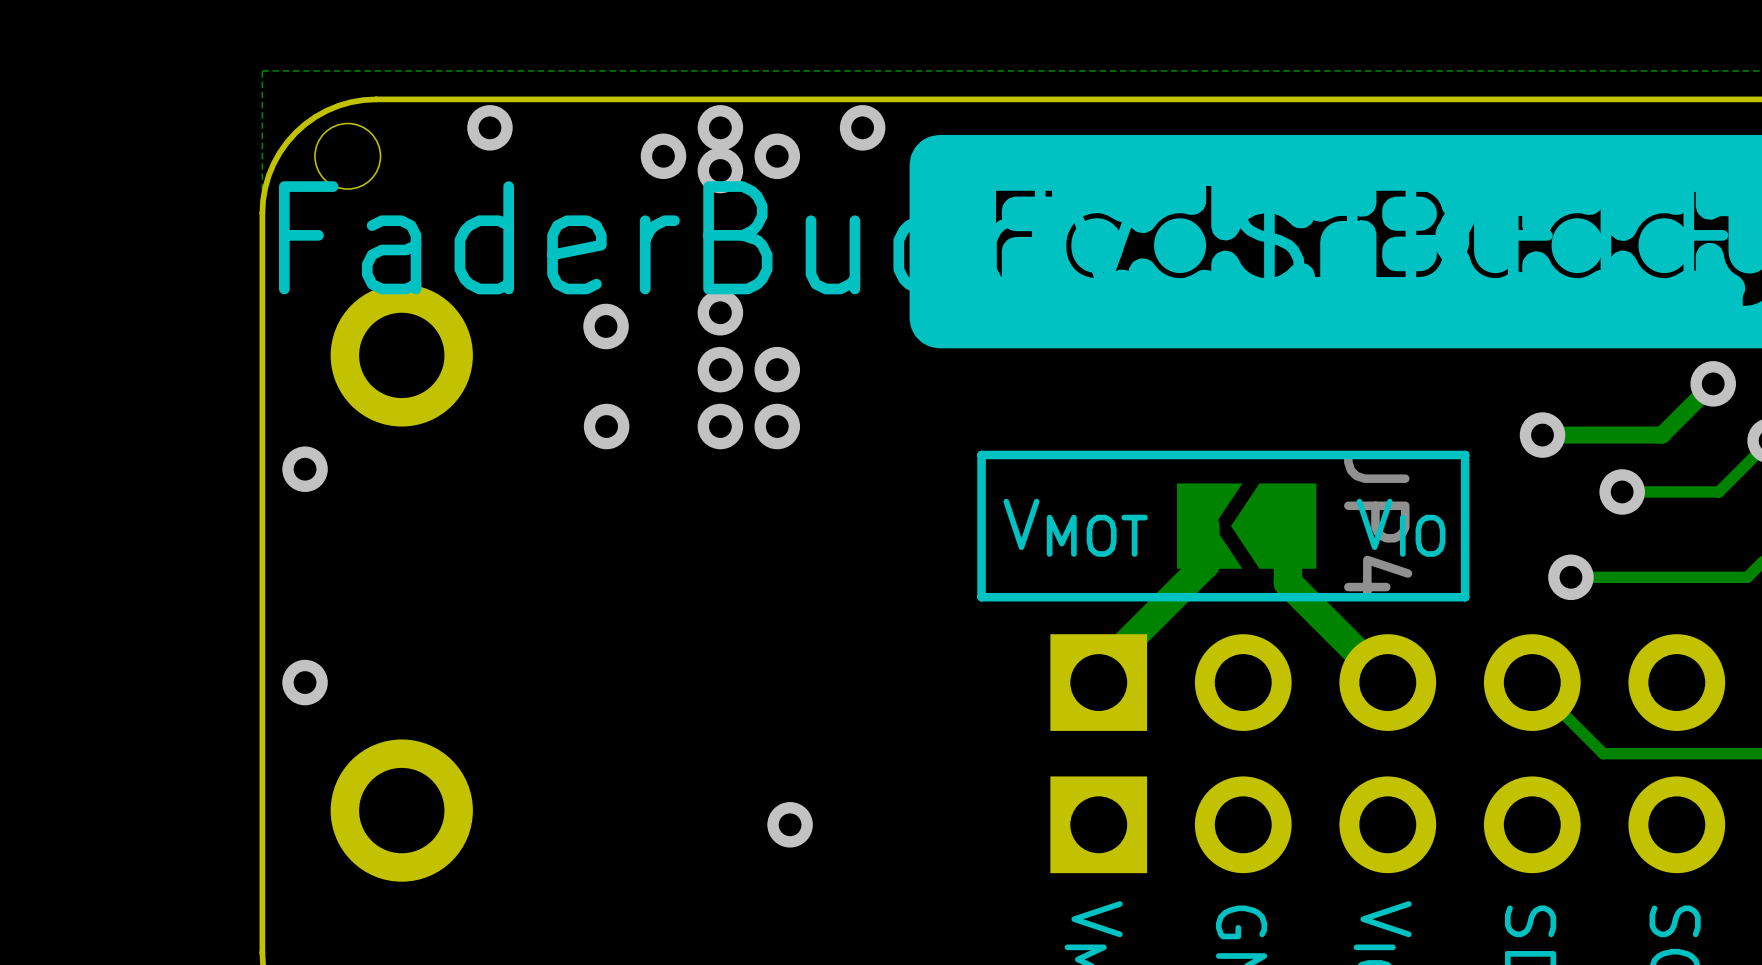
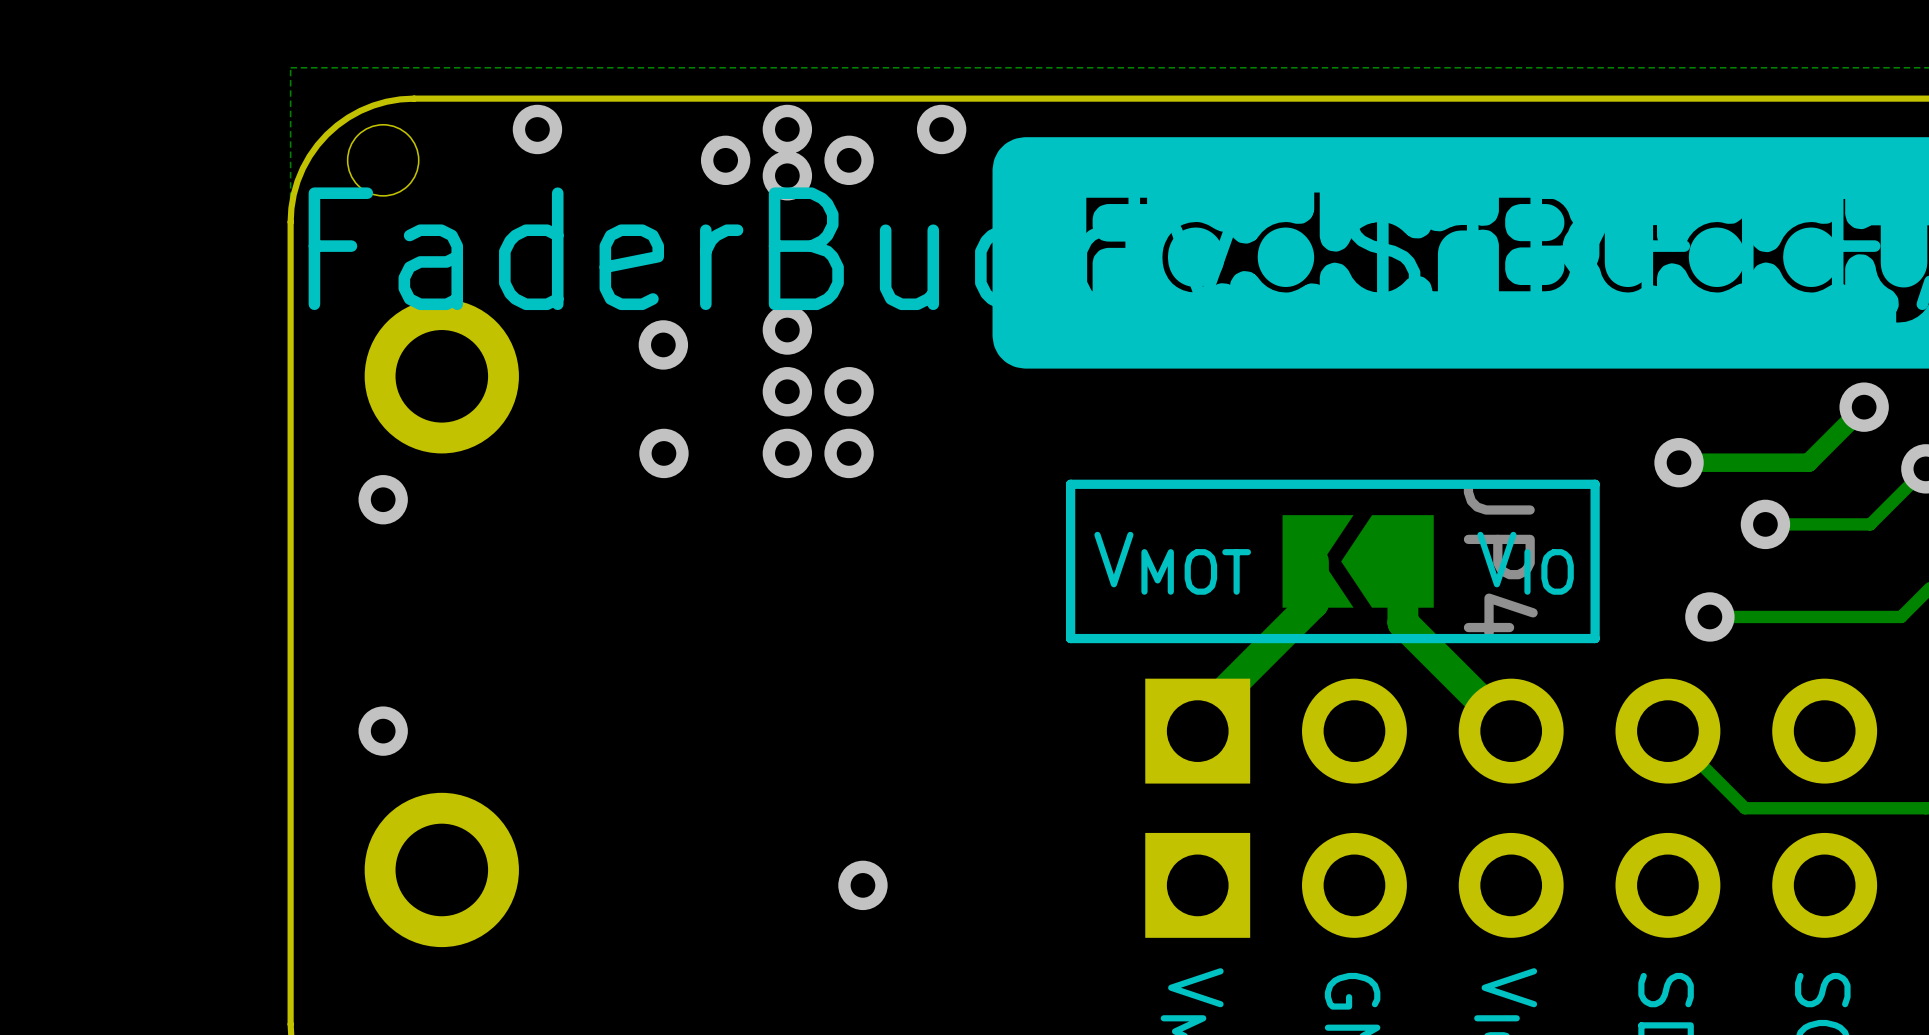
via position: (305, 469) -> (383, 499)
via position: (305, 682) -> (383, 731)

